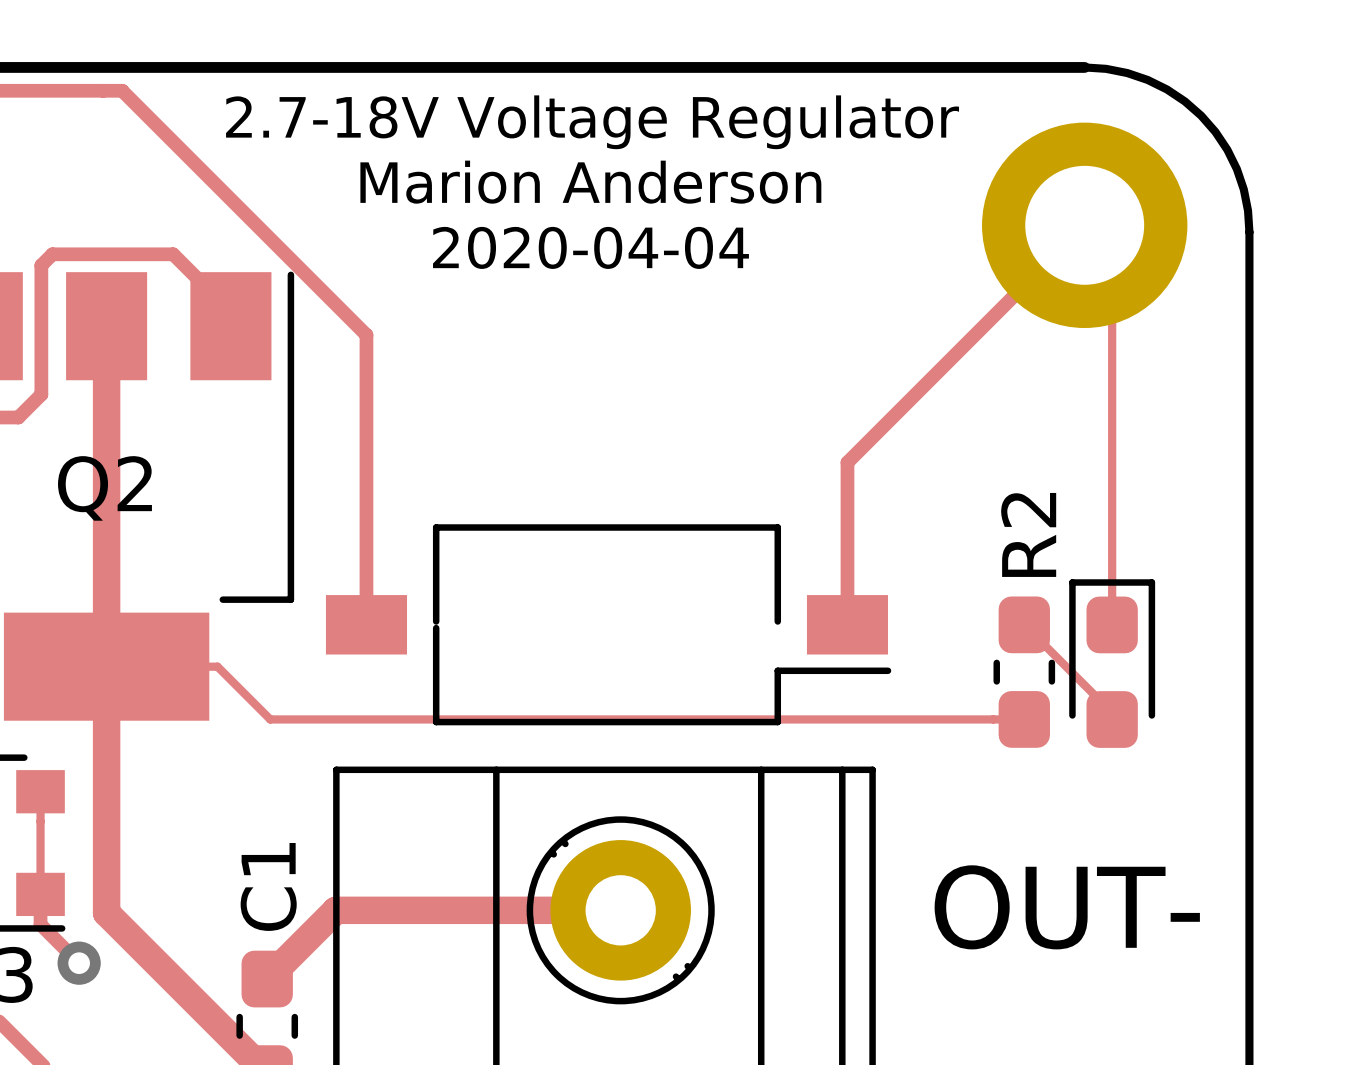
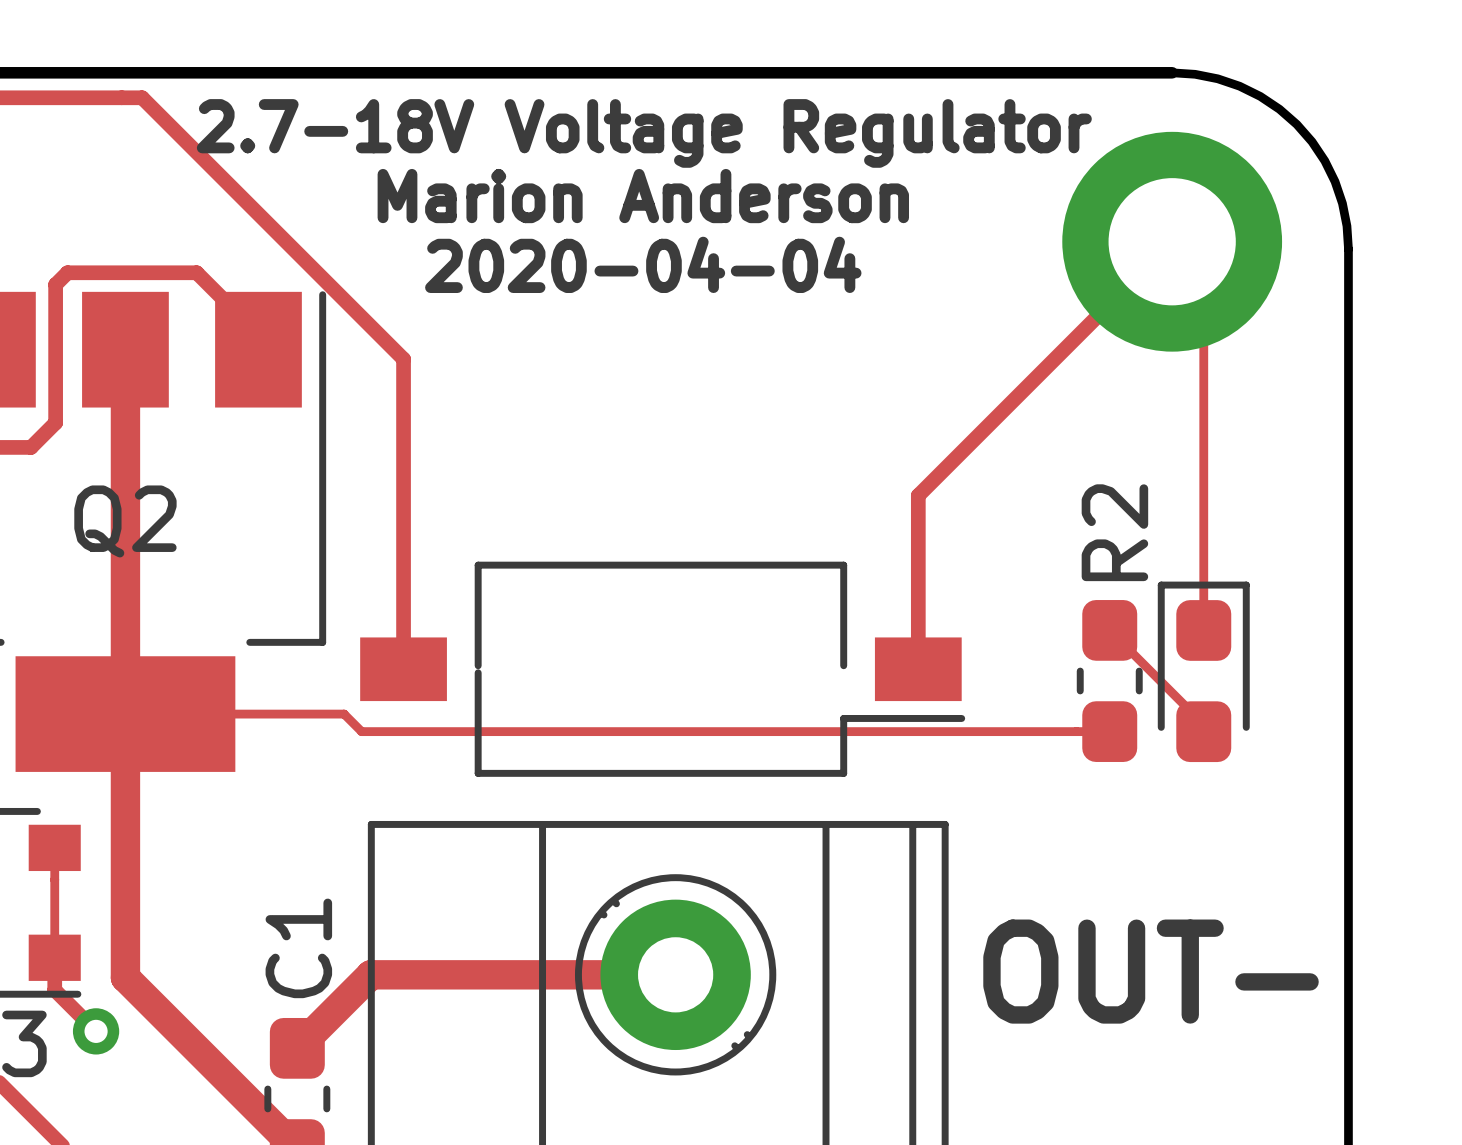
track: (1112, 252) (1112, 624) -> (1201, 271) (1203, 273) (1203, 630)
track: (1024, 624) (1112, 712) (1112, 719) -> (1109, 630) (1203, 724) (1203, 731)
part position: (1112, 663) -> (1203, 671)
track: (217, 666) (270, 719) (1024, 719) -> (244, 714) (344, 714) (361, 731) (1109, 731)
R2 position: (1024, 672) -> (1109, 681)

